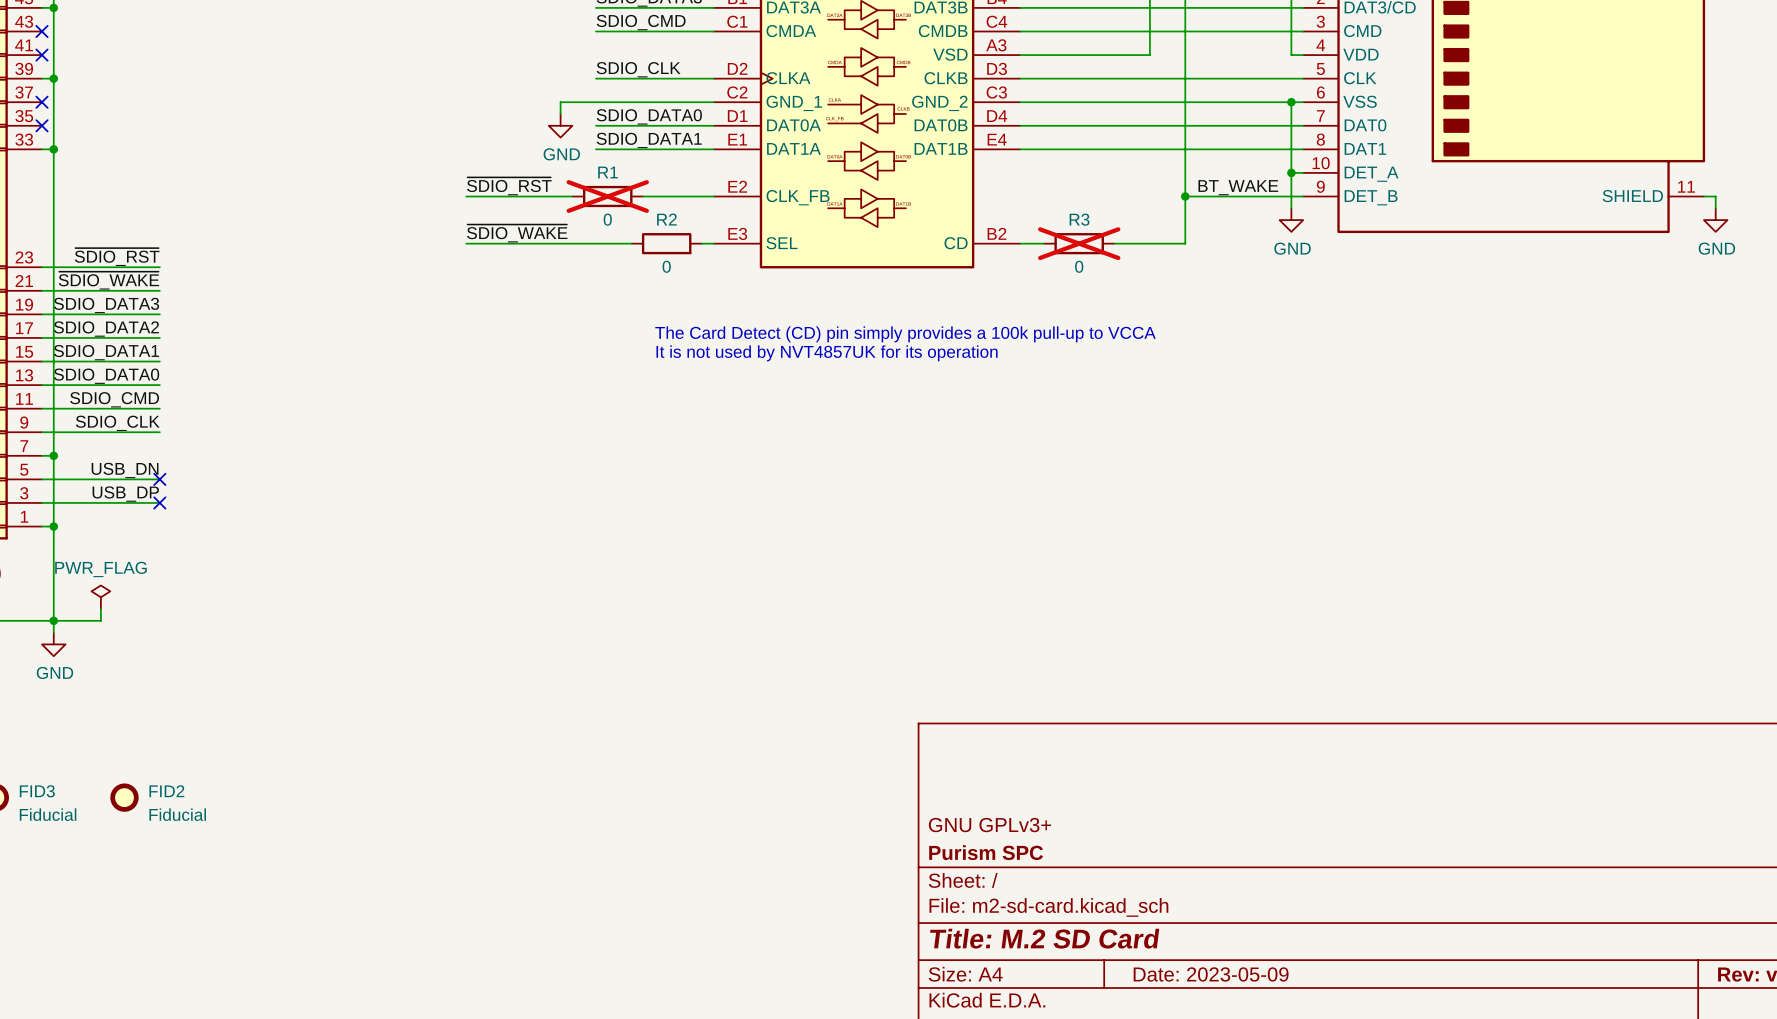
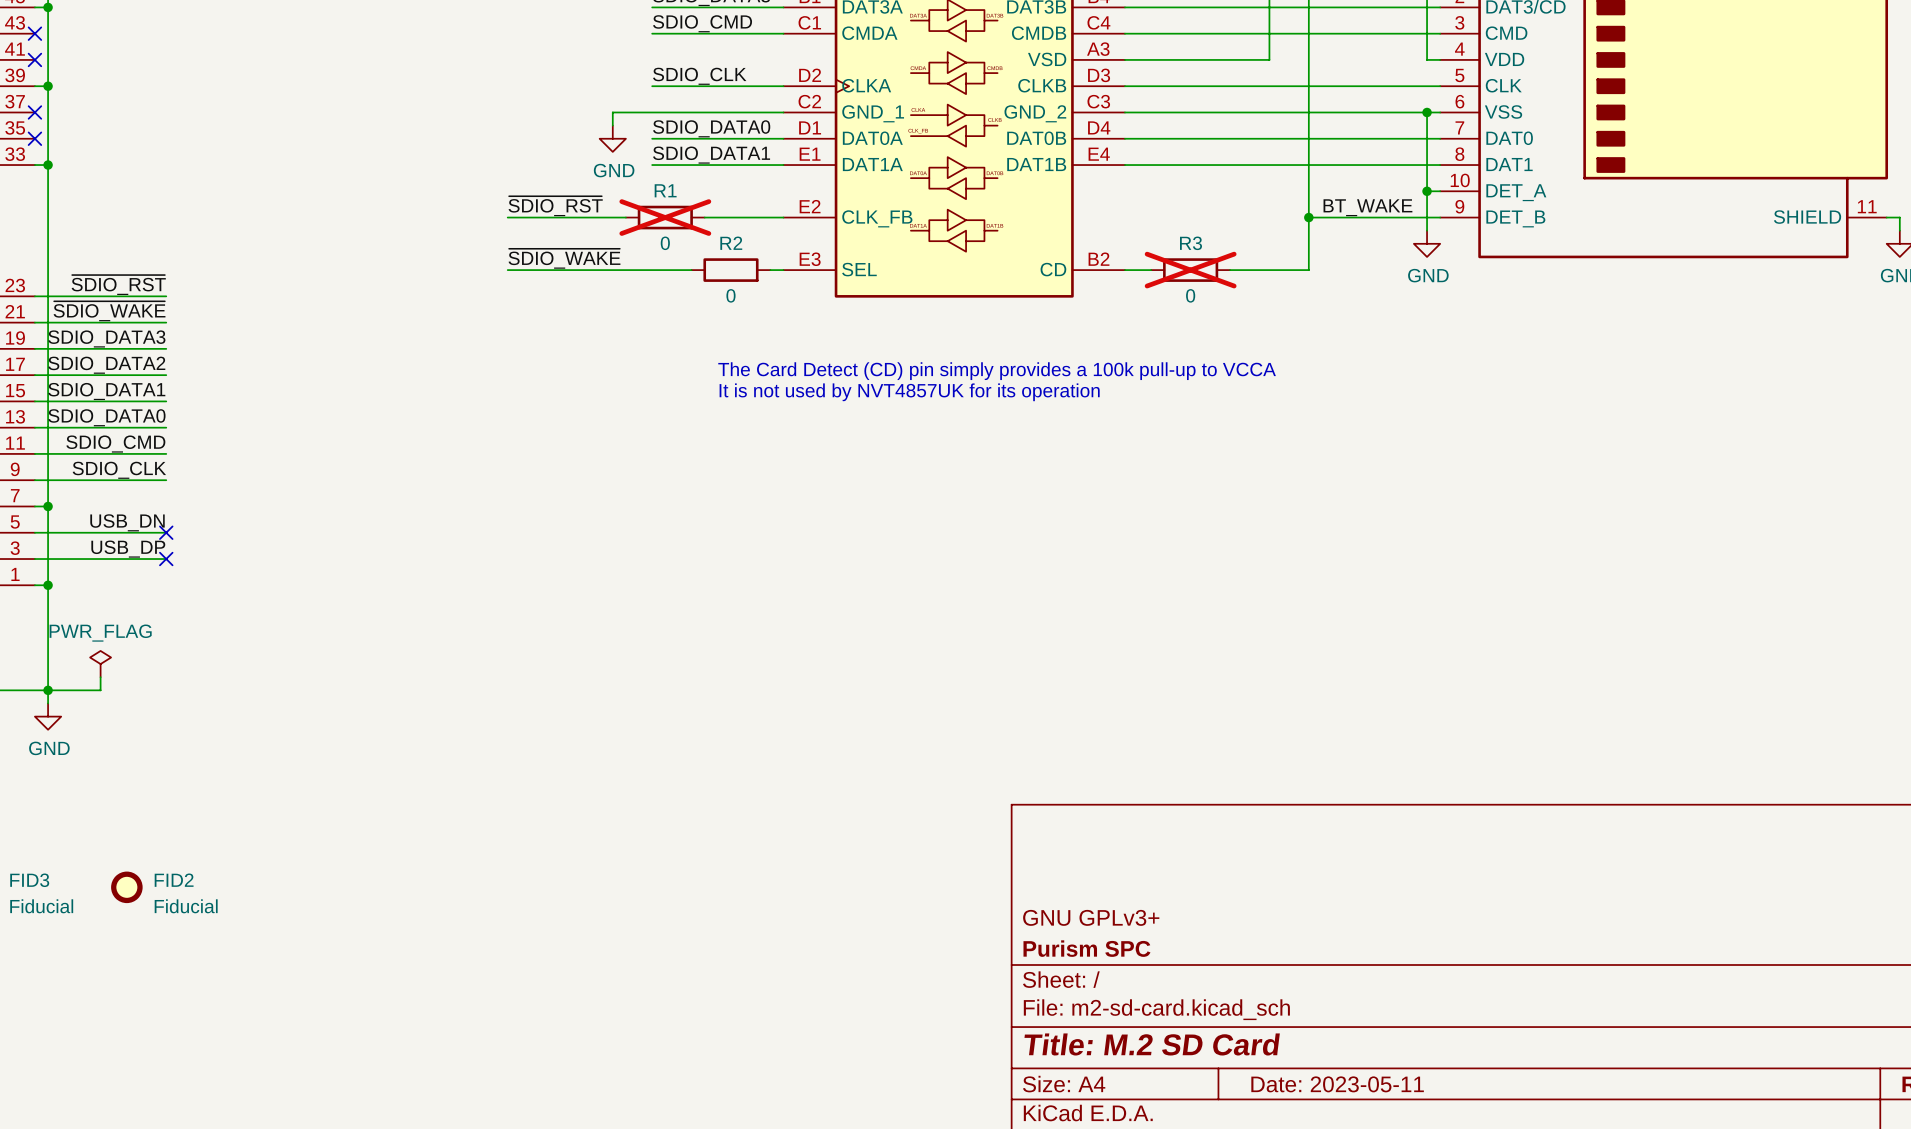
title block: Date: 2023-05-09 (1211, 974) -> Date: 2023-05-11 (1337, 1084)

